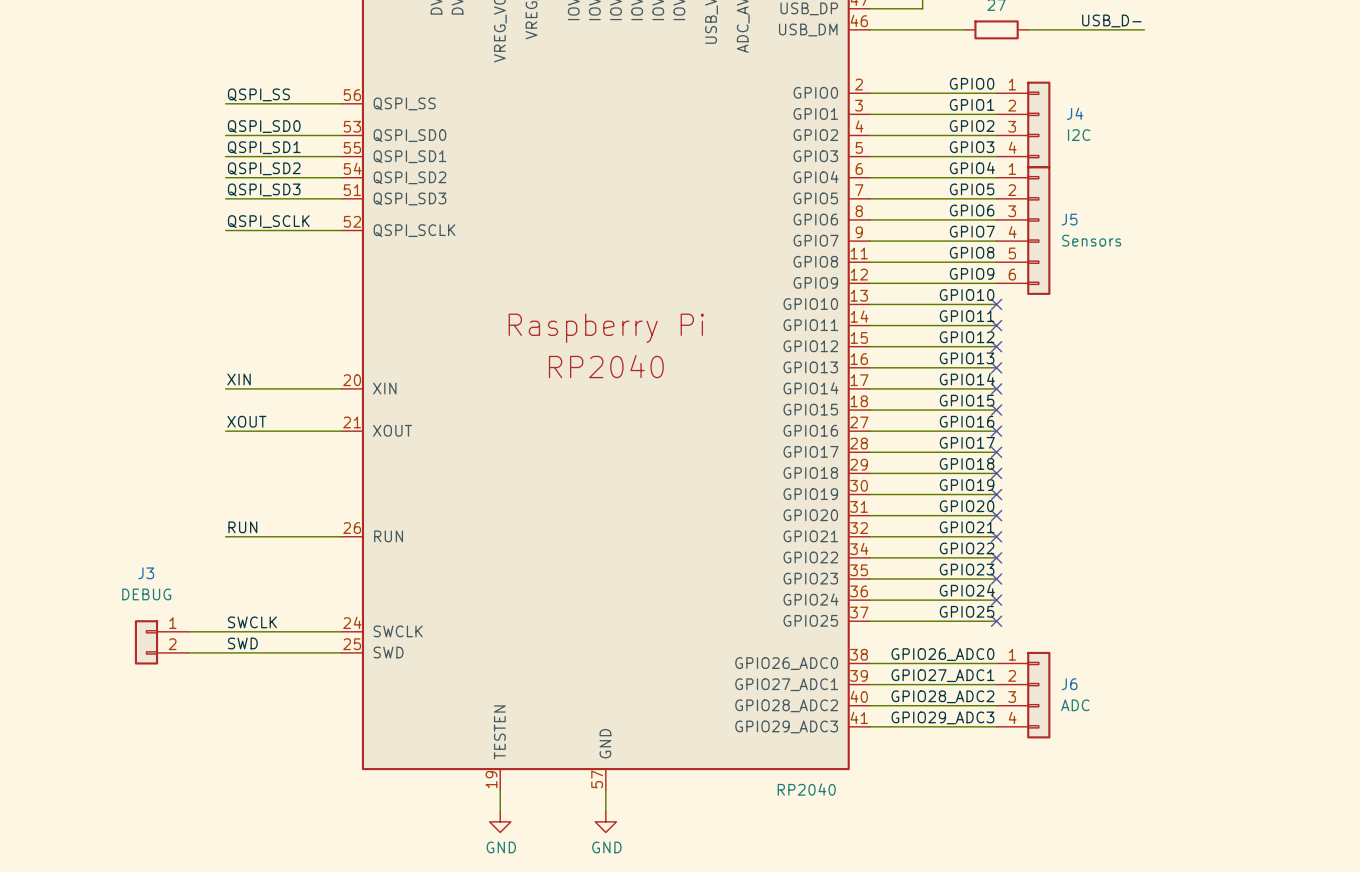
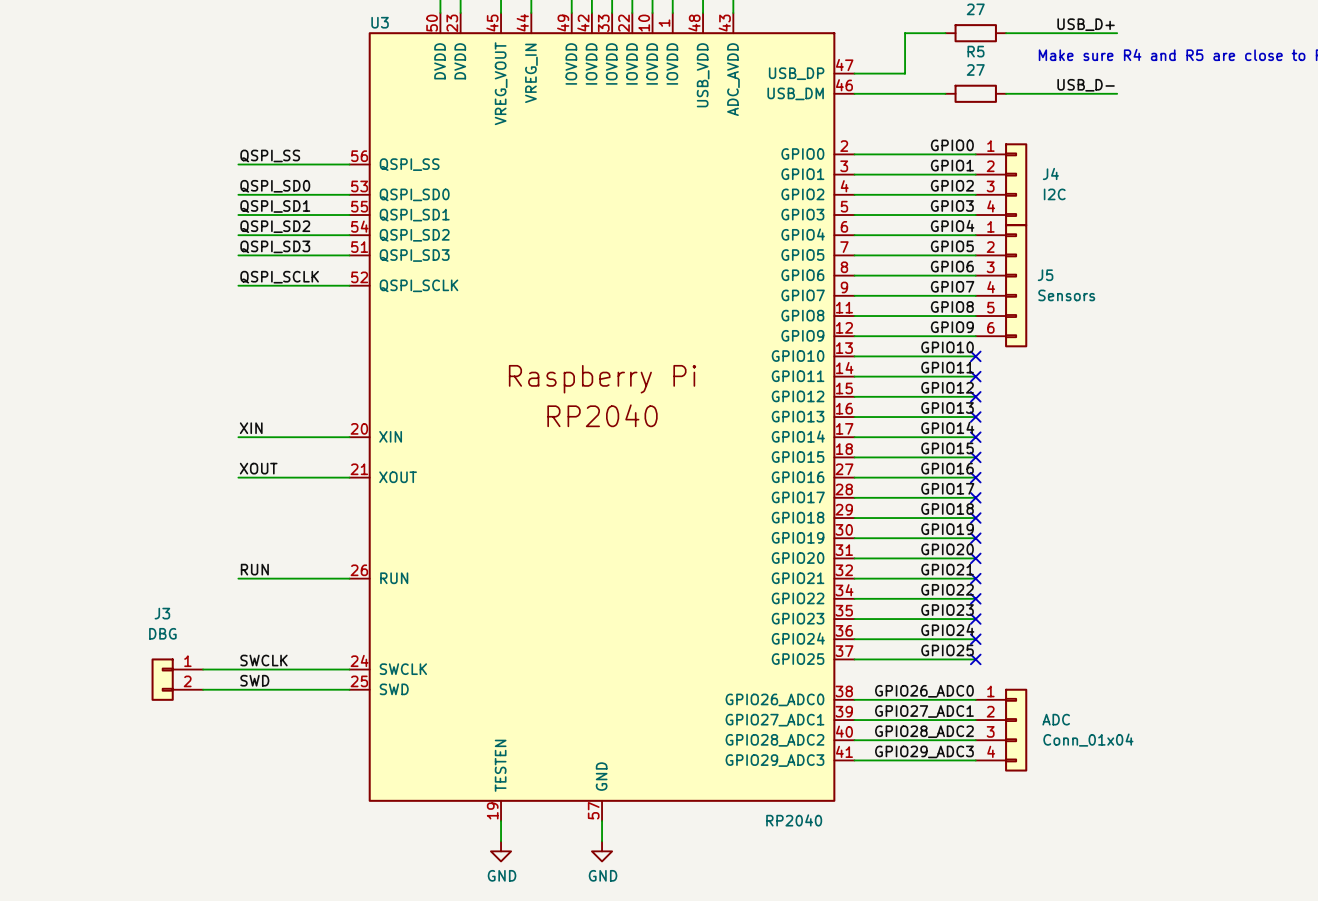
J3 value: DEBUG (146, 594) -> DBG (162, 633)
J6 name: J6 (1069, 684) -> ADC (1056, 719)
J6 value: ADC (1075, 705) -> Conn_01x04 (1088, 740)

